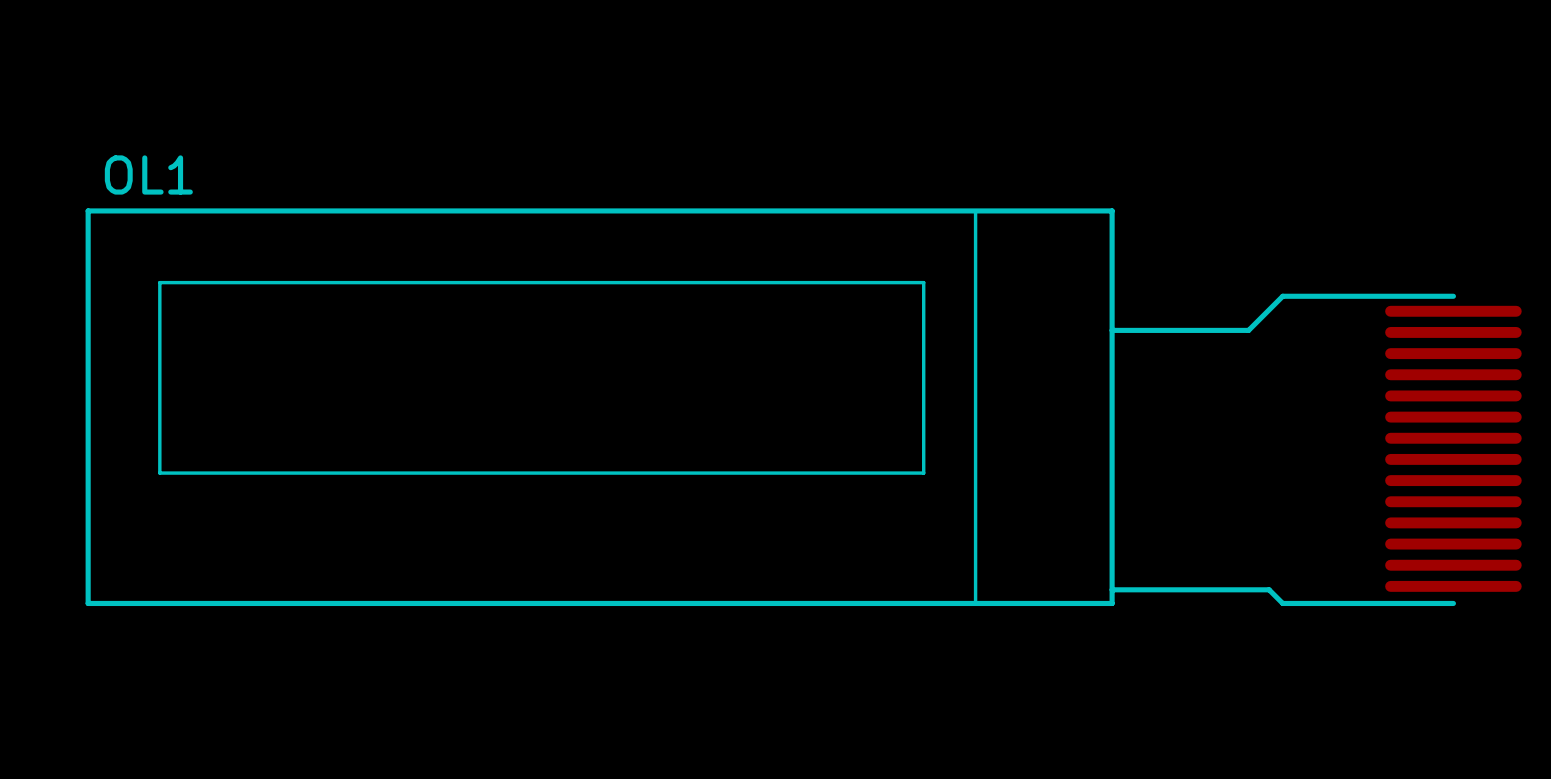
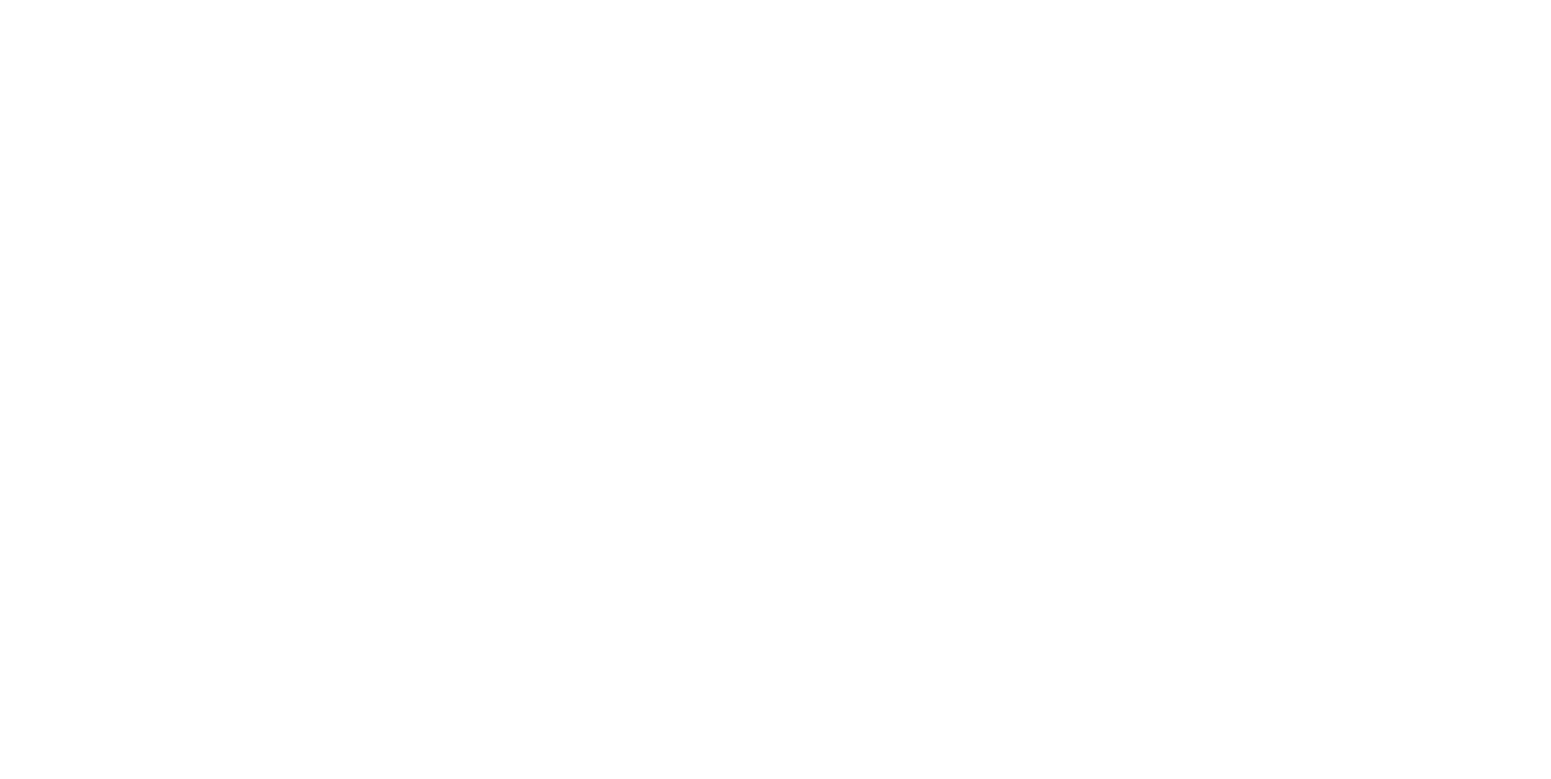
OL1: (803, 407) -> none

